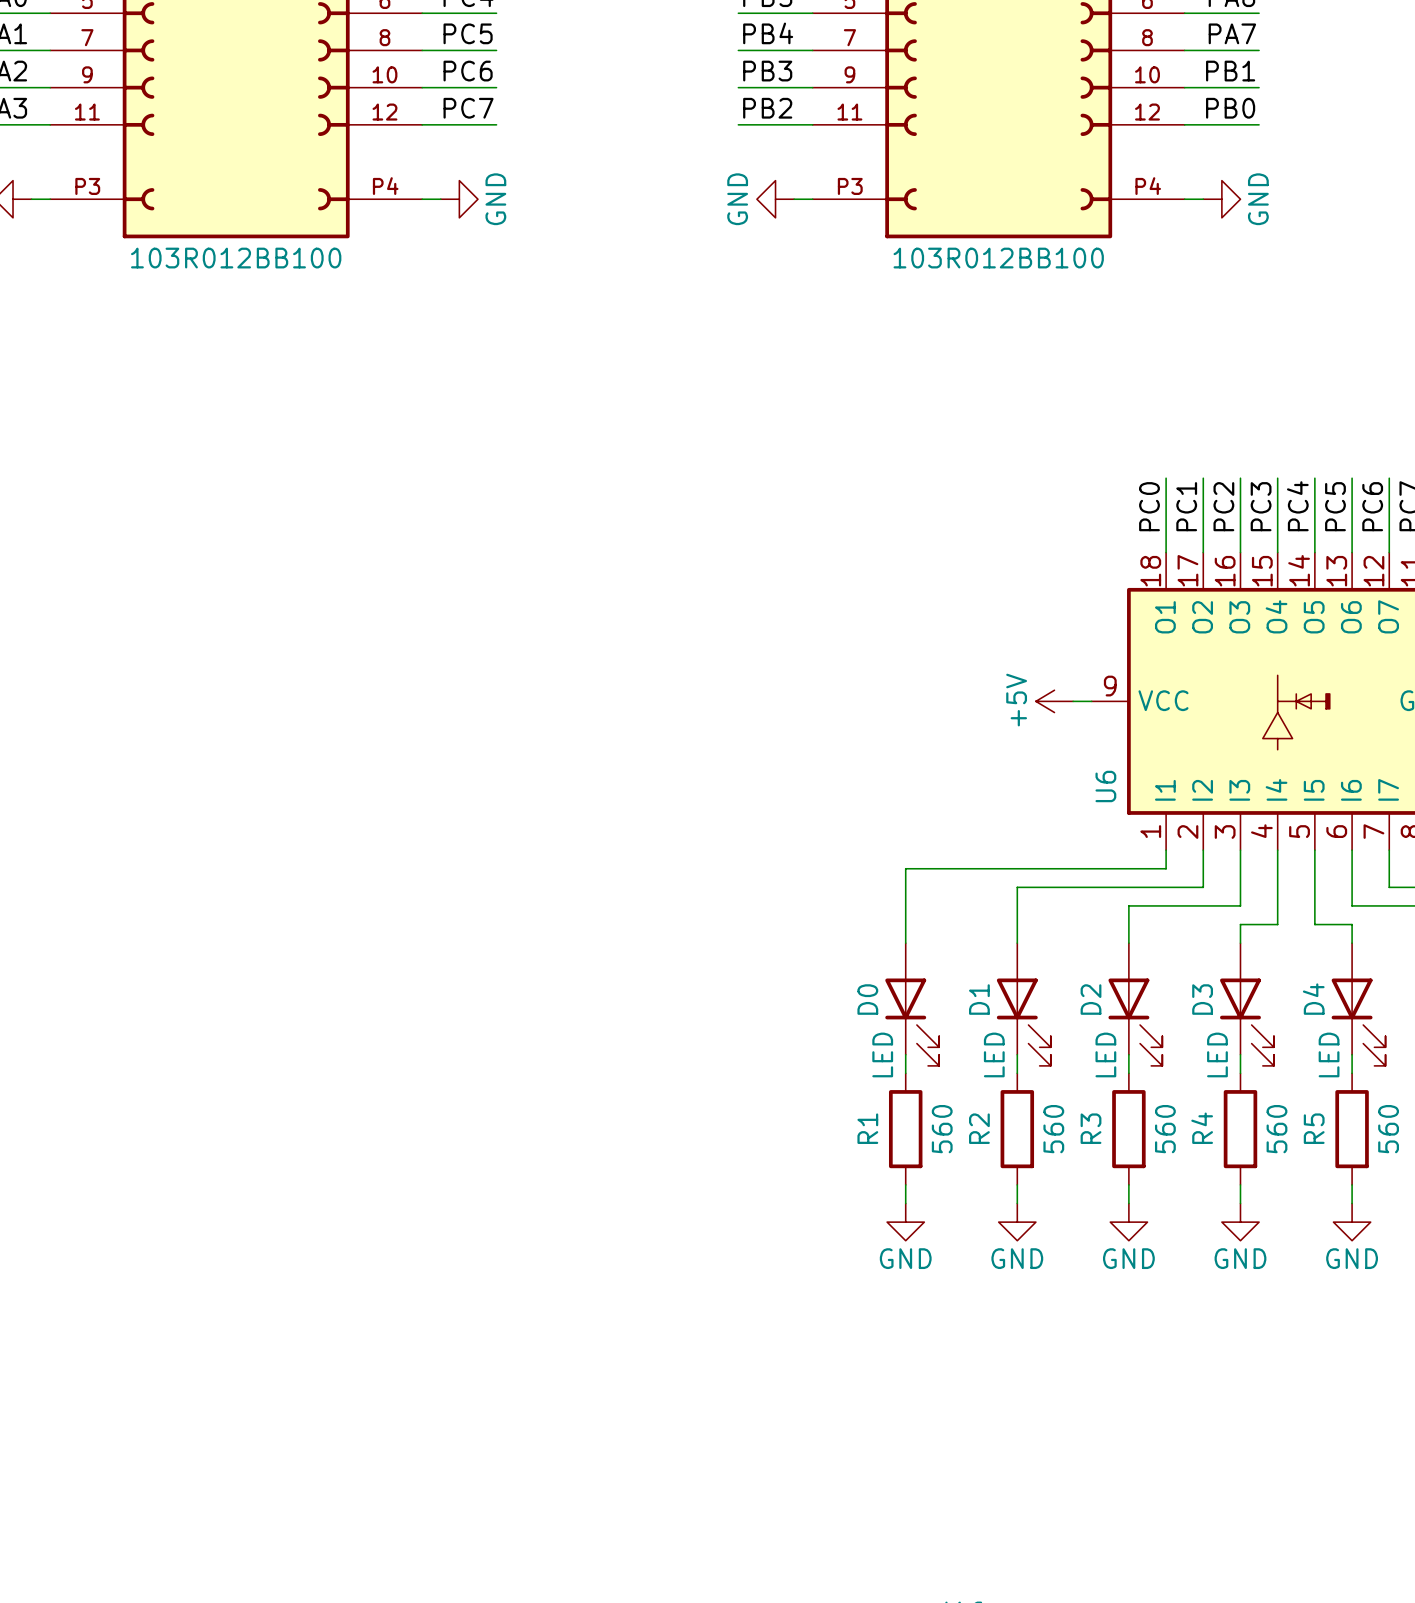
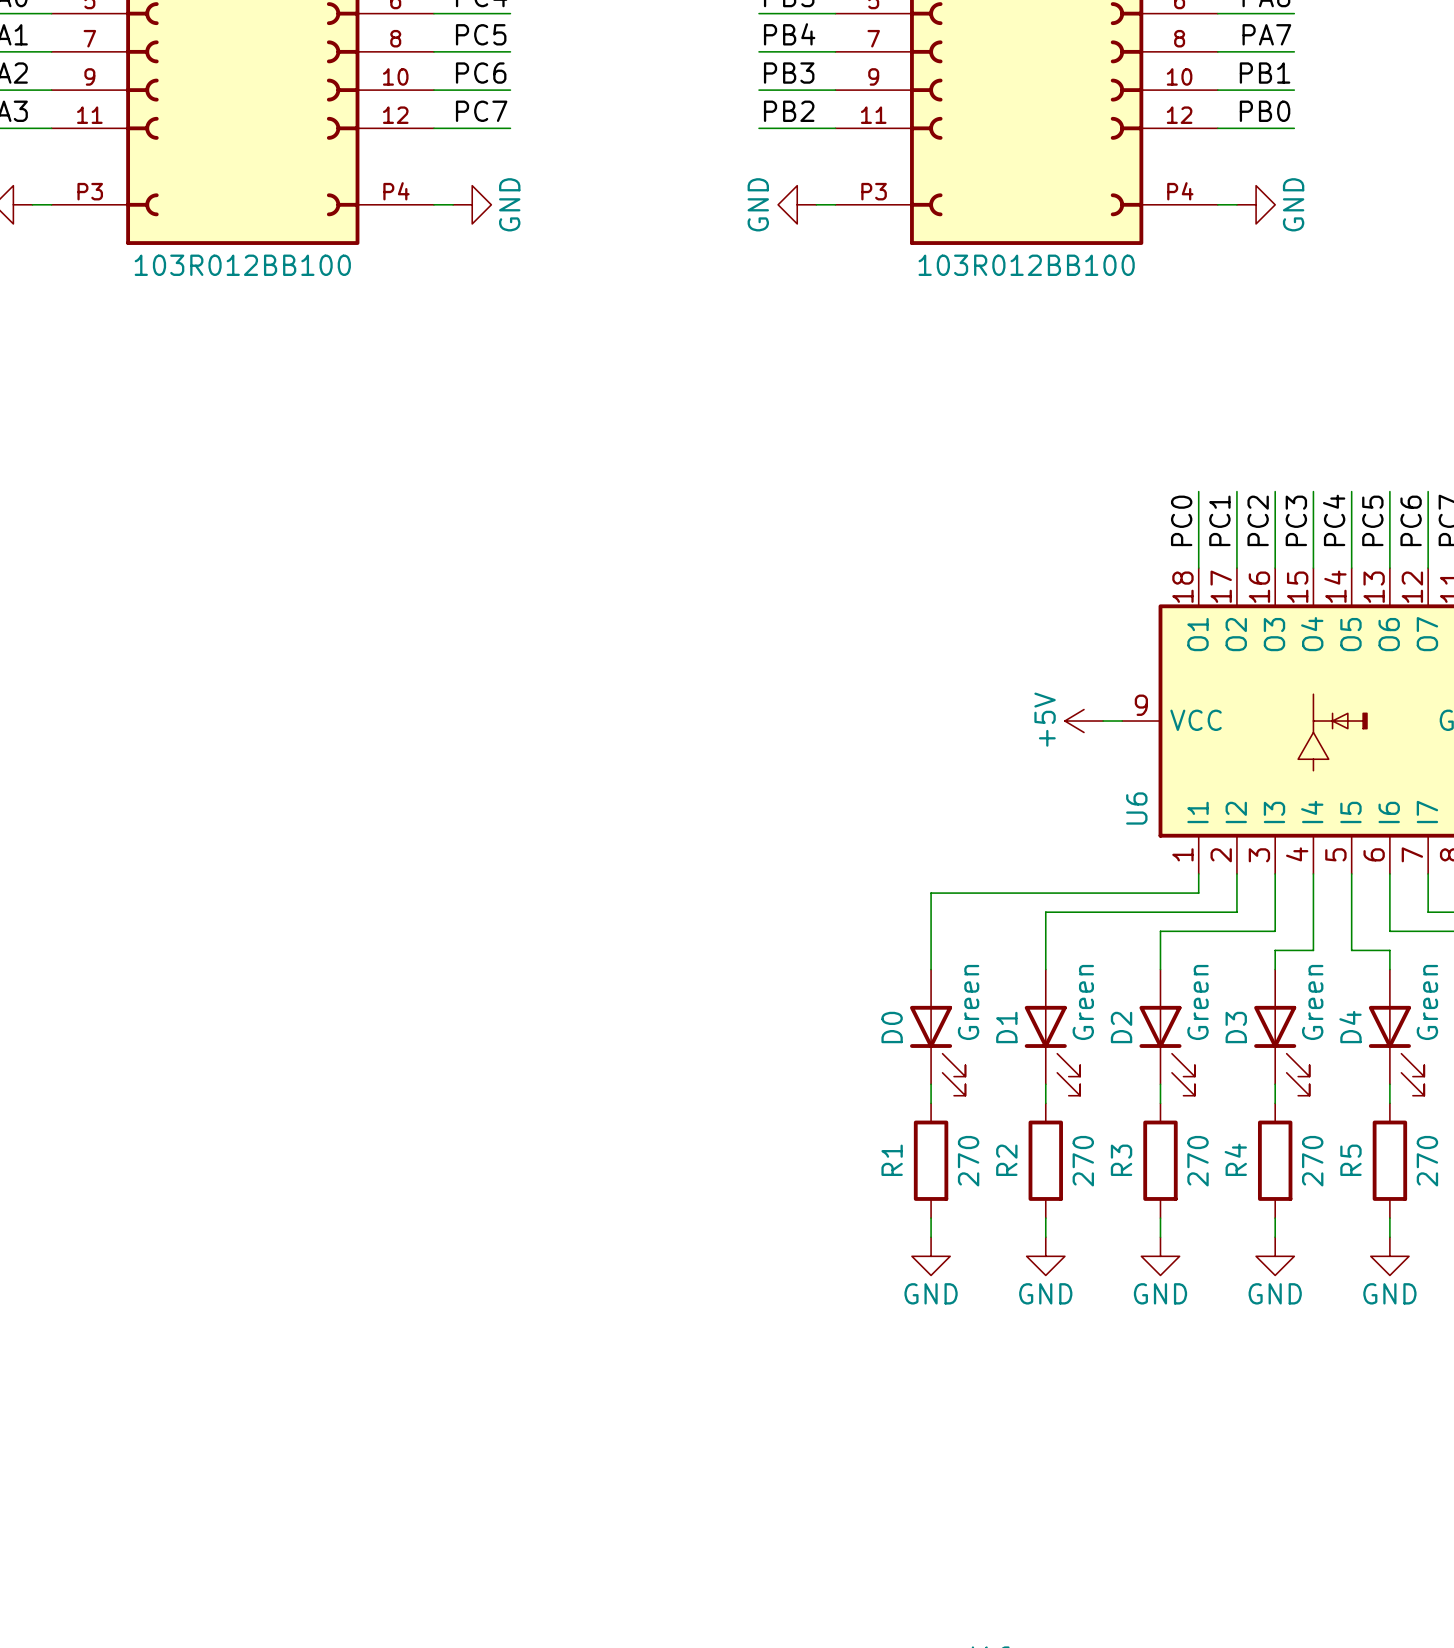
D0 value: LED (882, 1054) -> Green (968, 1002)
D1 value: LED (994, 1054) -> Green (1083, 1002)
D2 value: LED (1105, 1054) -> Green (1198, 1002)
D3 value: LED (1217, 1054) -> Green (1312, 1002)
D4 value: LED (1329, 1054) -> Green (1427, 1002)
R1 value: 560 (942, 1129) -> 270 (968, 1161)
R2 value: 560 (1053, 1129) -> 270 (1083, 1161)
R3 value: 560 (1165, 1129) -> 270 (1198, 1161)
R4 value: 560 (1276, 1129) -> 270 (1312, 1161)
R5 value: 560 (1388, 1129) -> 270 (1427, 1161)

